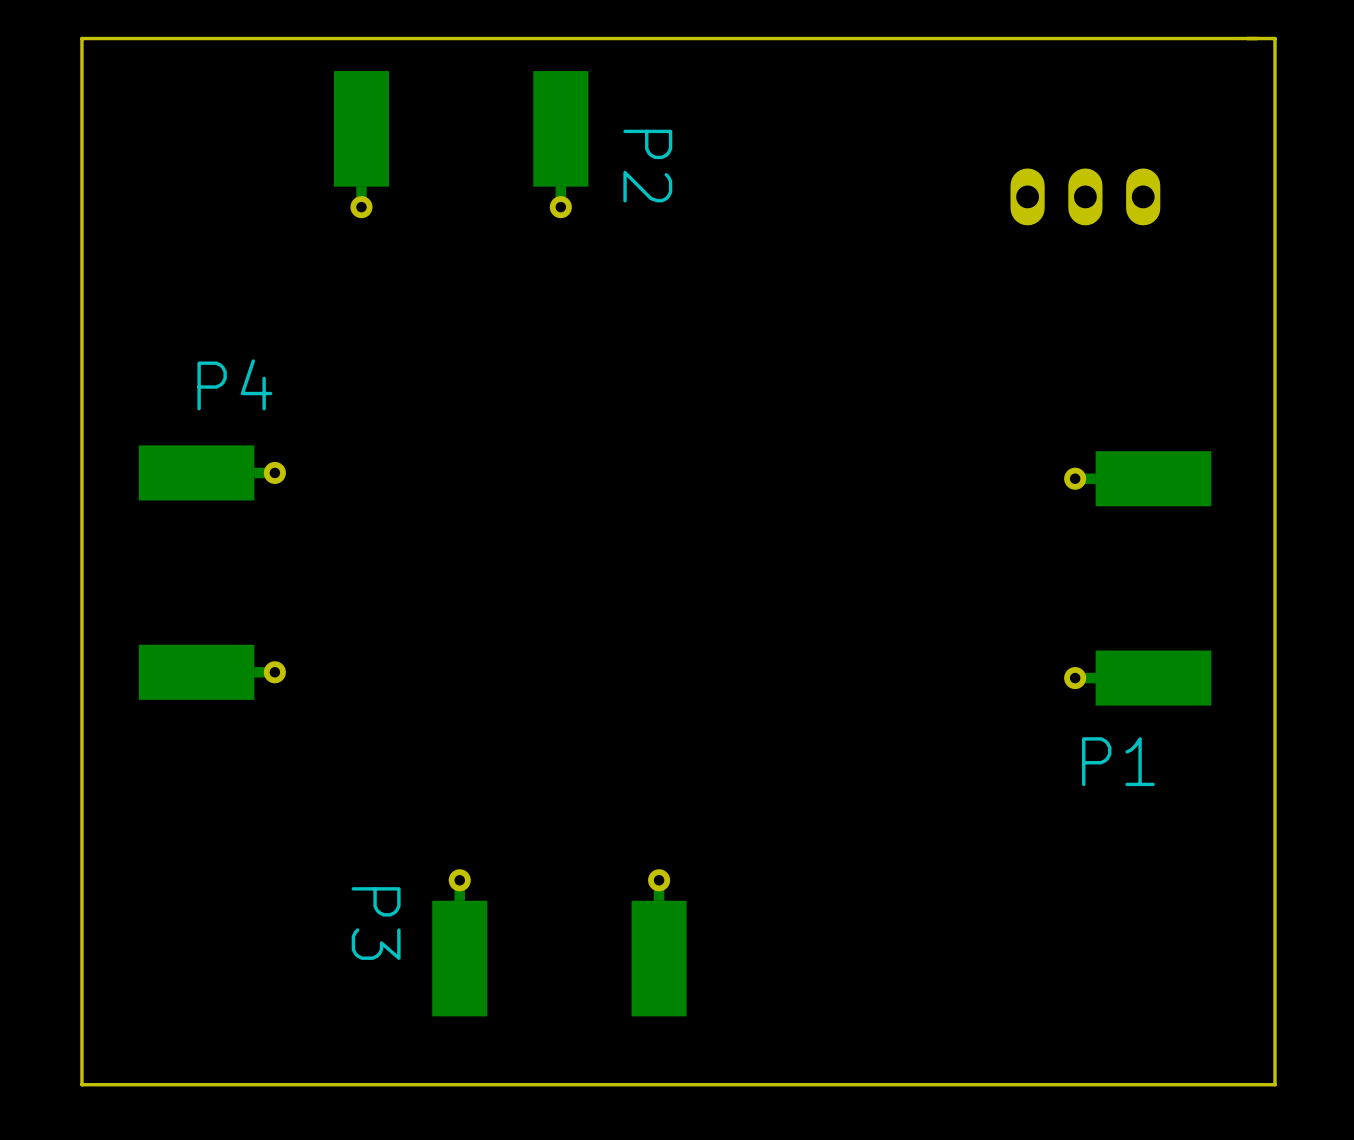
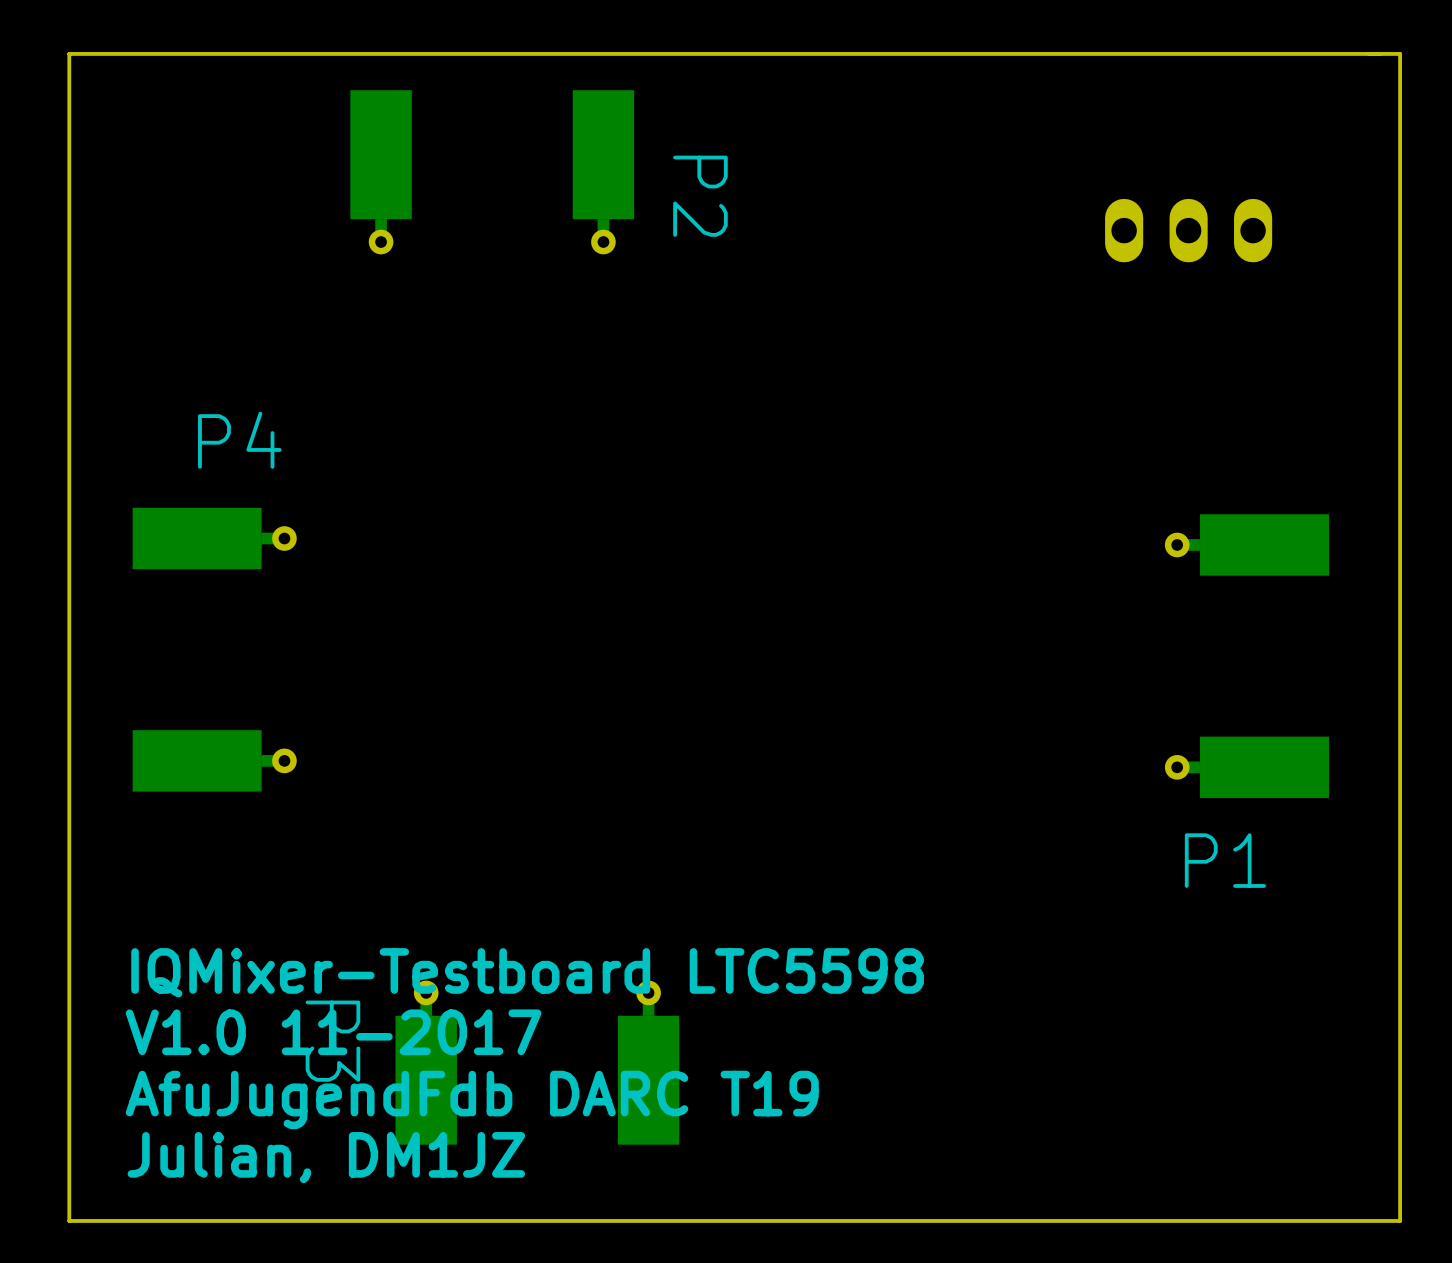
text: none -> IQMixer-Testboard LTC5598 (527, 972)
text: none -> V1.0 11-2017 (333, 1032)
P3 position: (559, 942) -> (537, 1062)
text: none -> AfuJugendFdb DARC T19 (472, 1099)
text: none -> Julian, DM1JZ (326, 1157)

